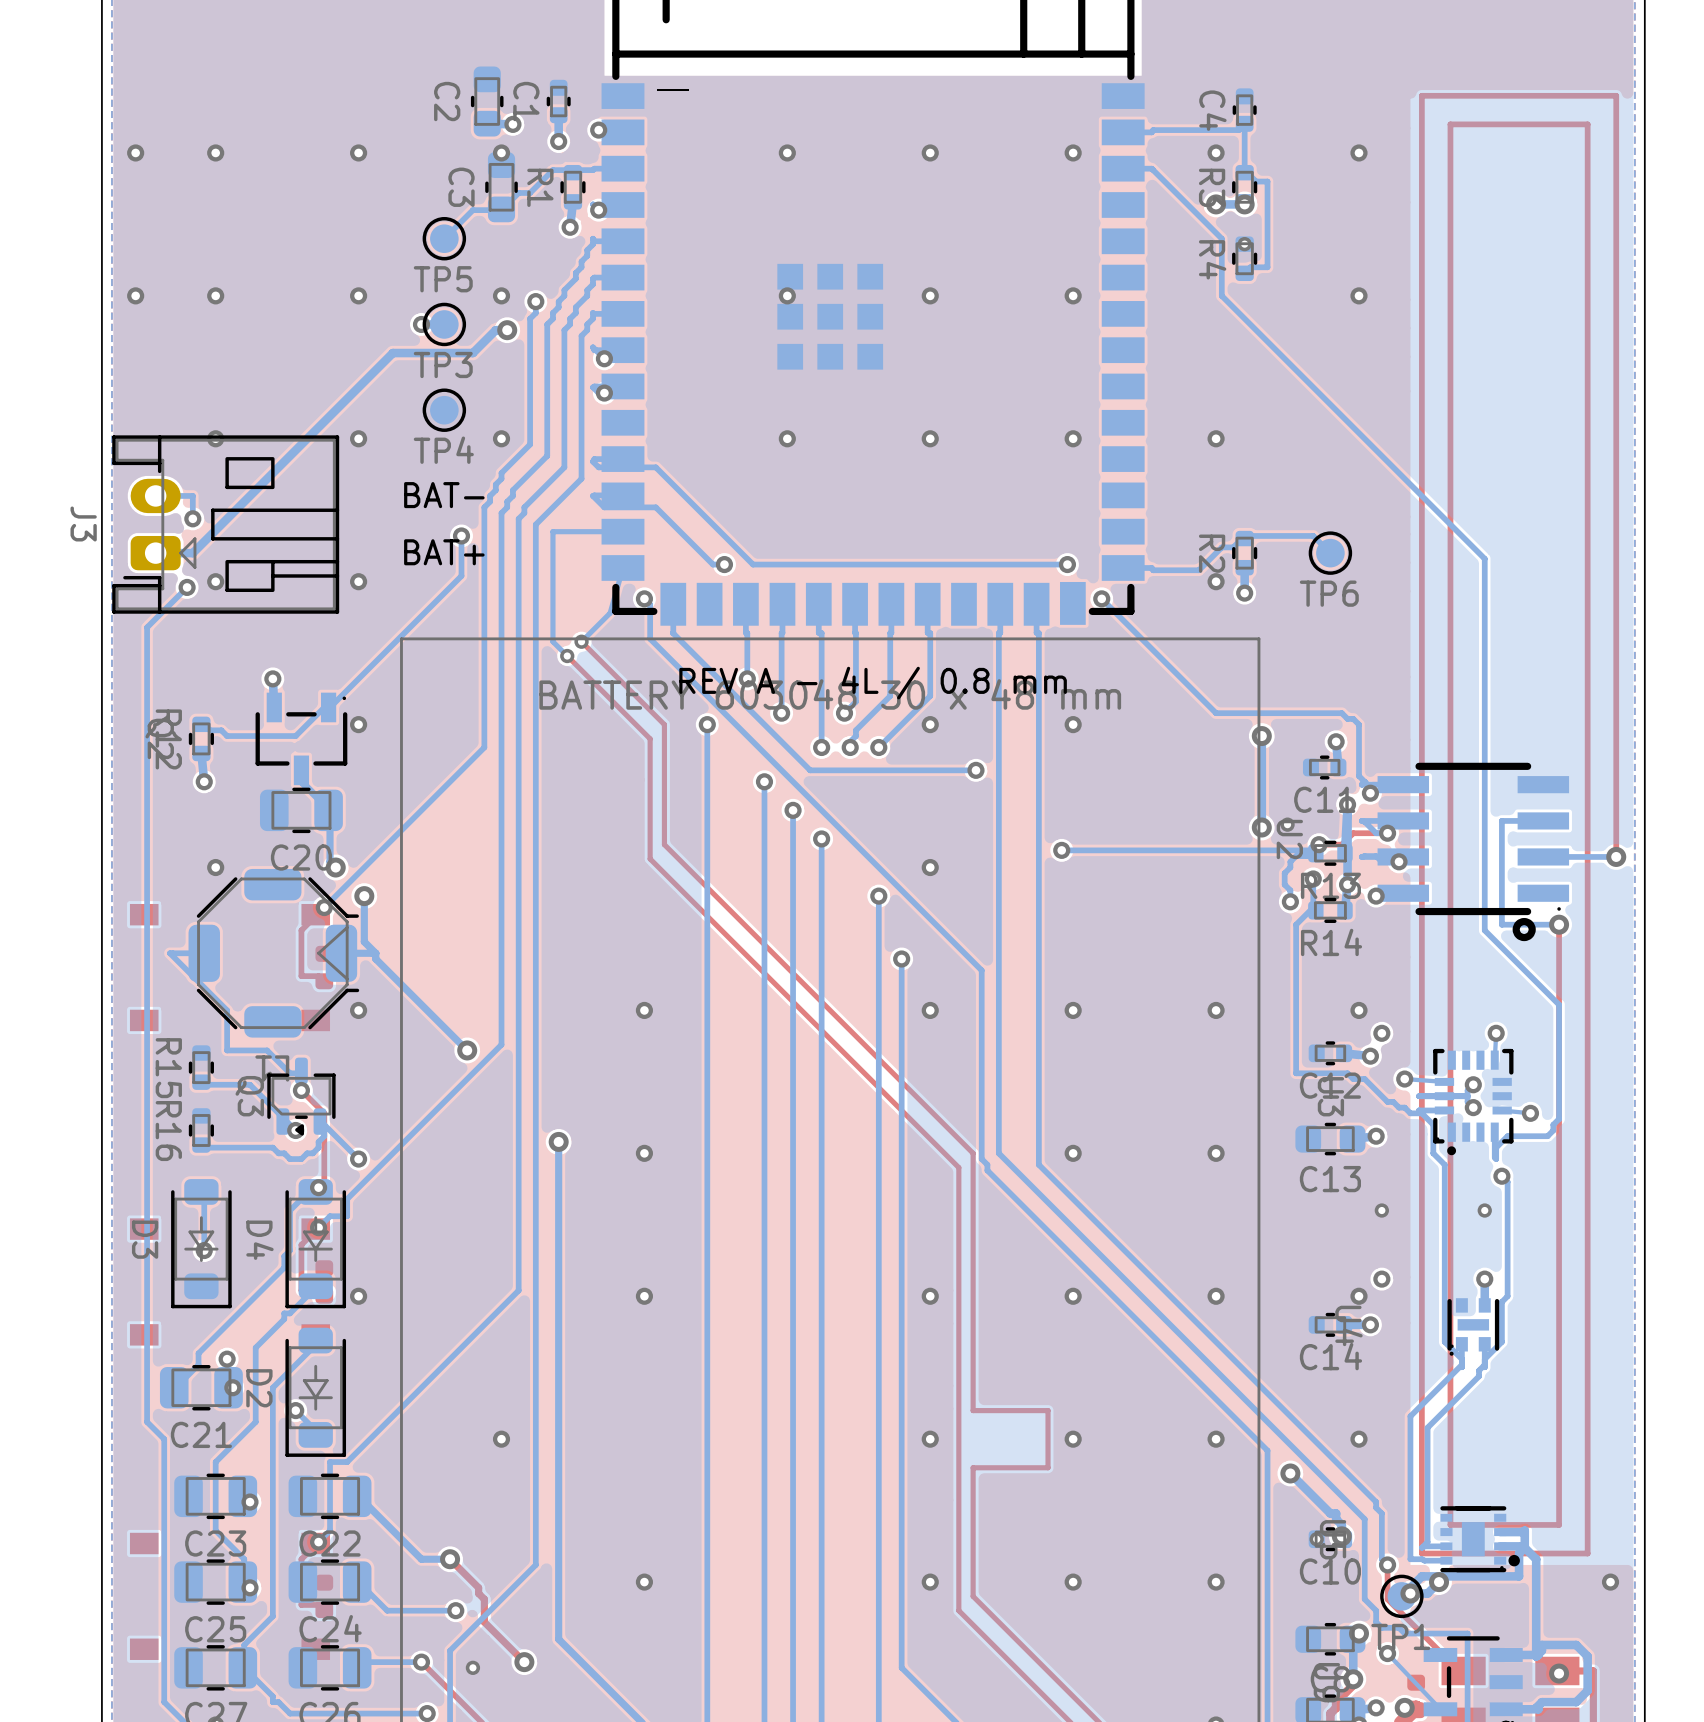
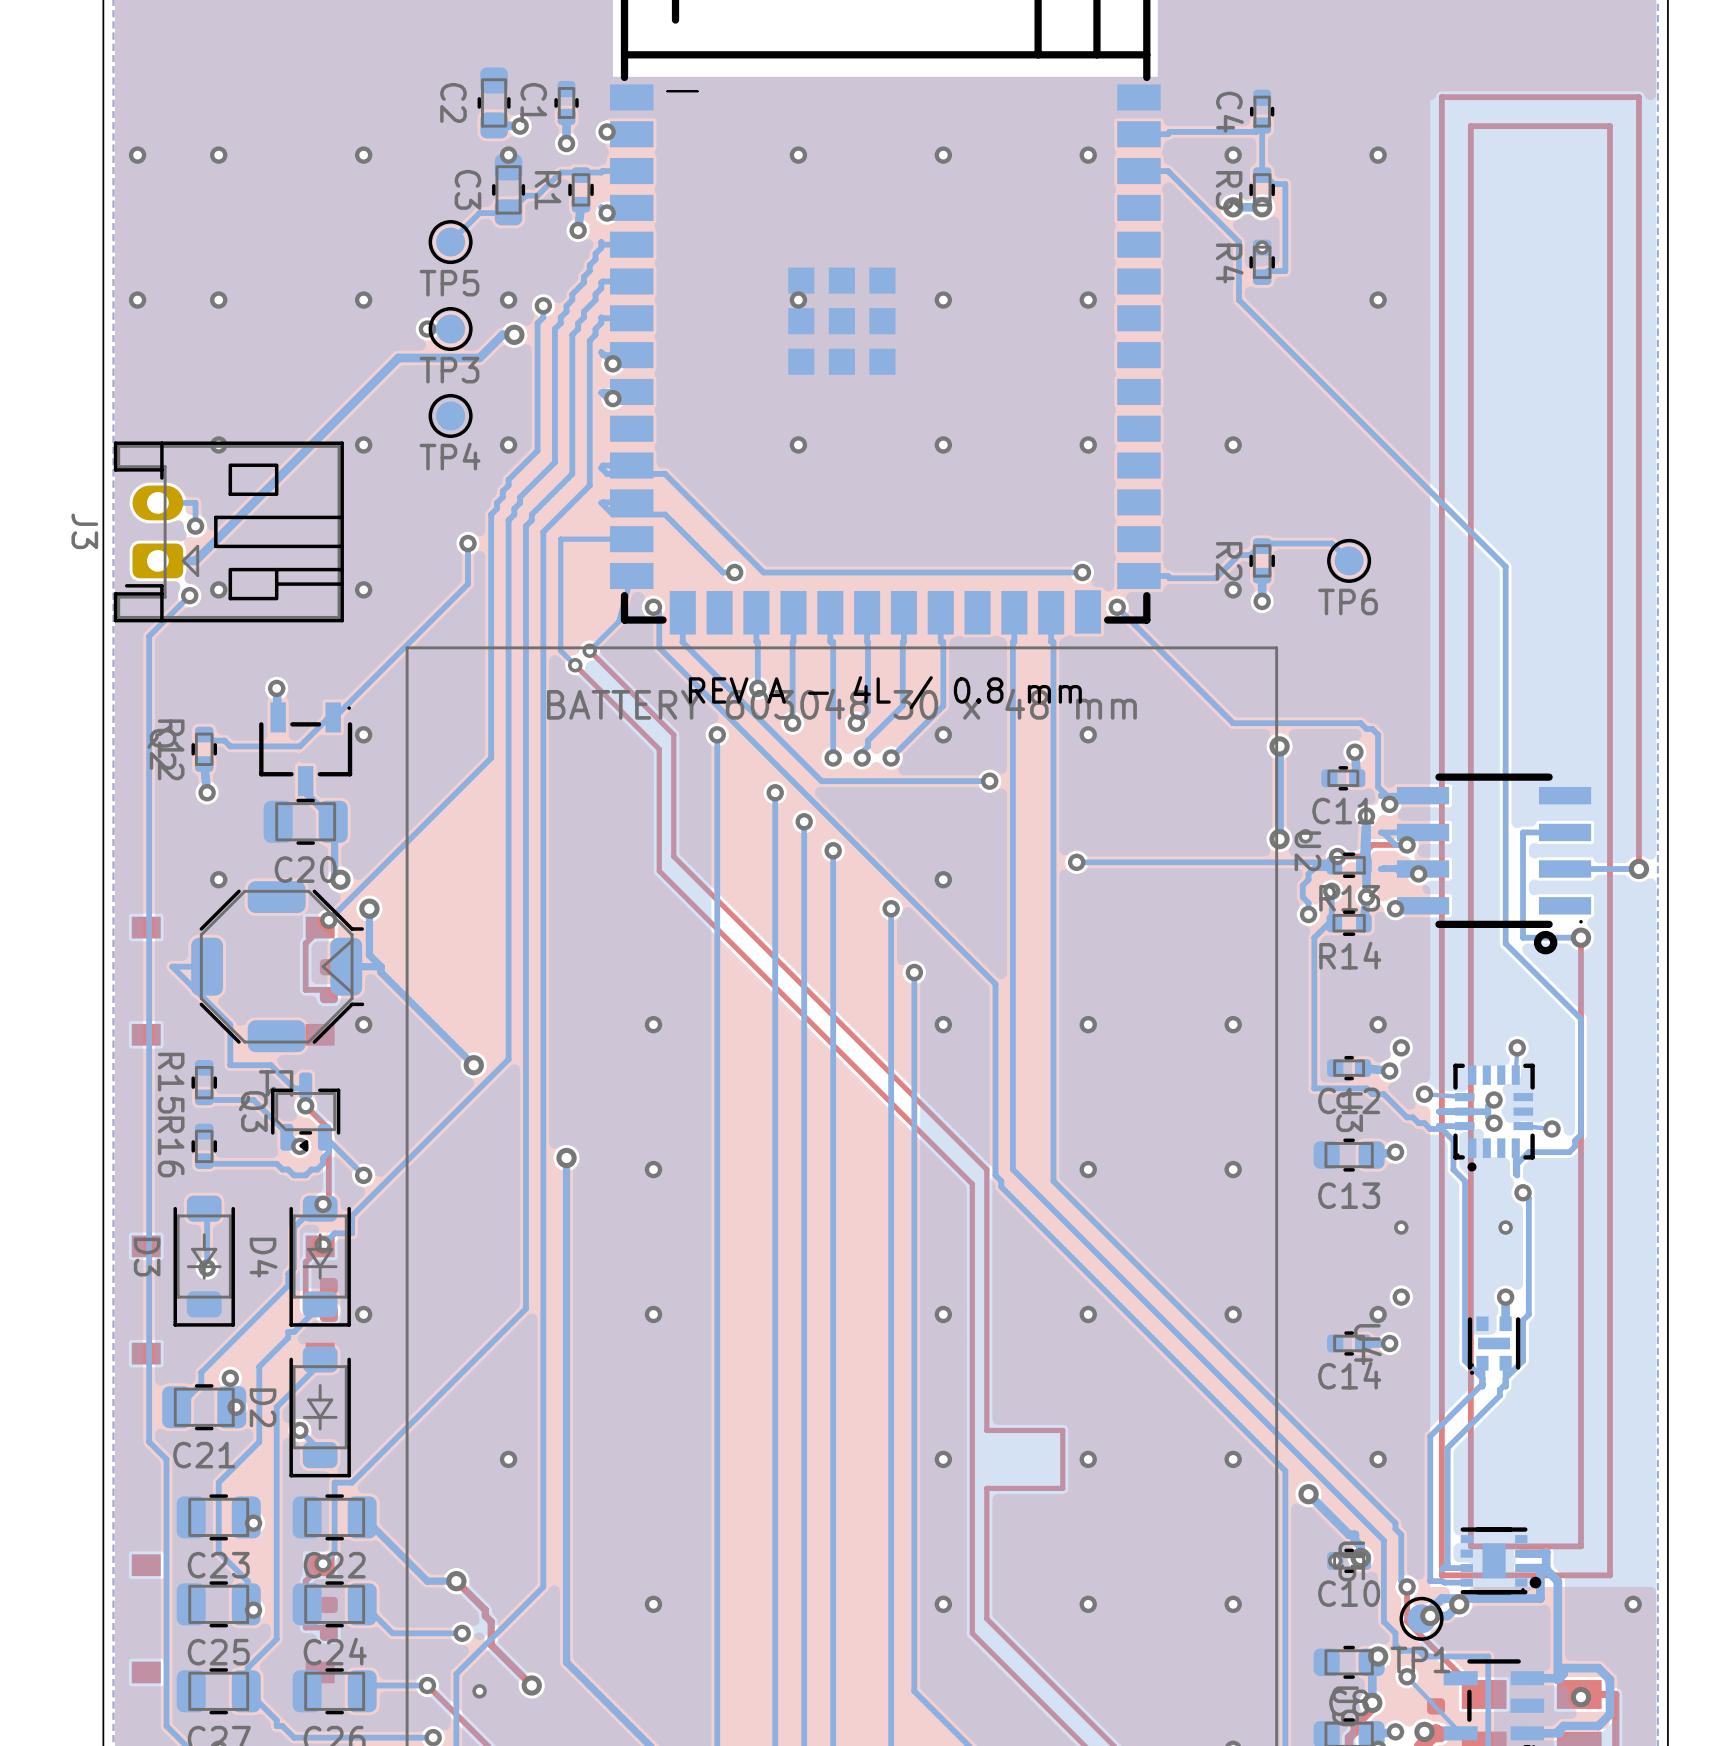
text: BAT- (444, 495) -> none
text: BAT+ (444, 552) -> none

